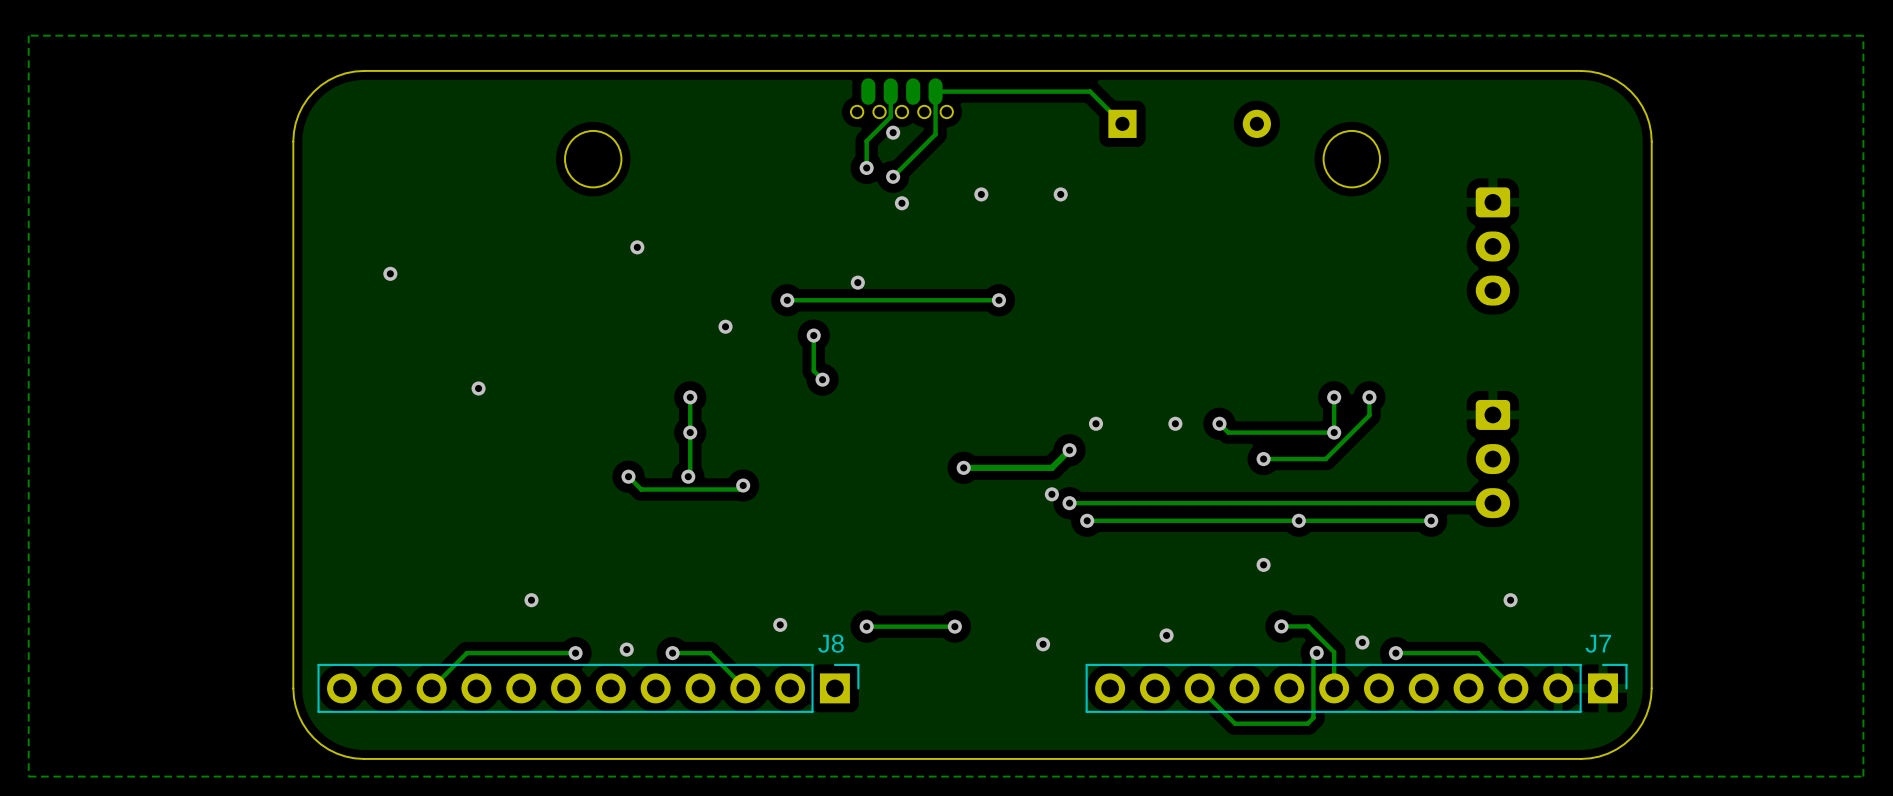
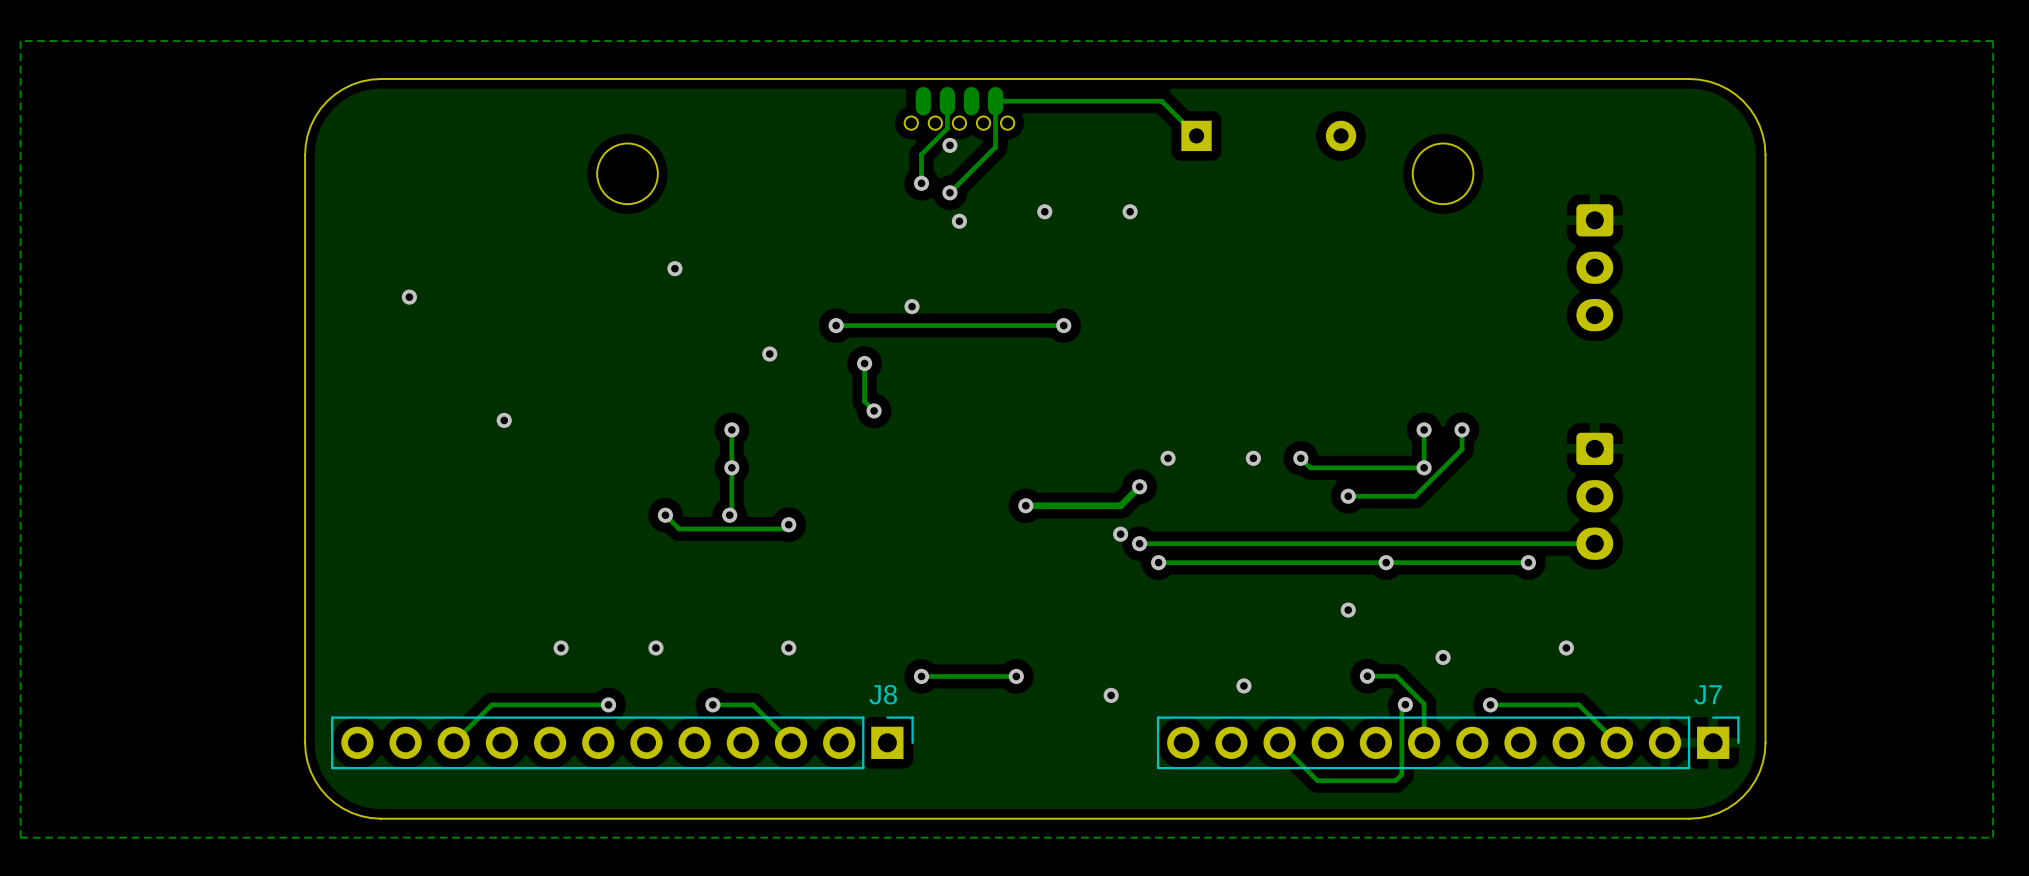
via position: (1510, 600) -> (1566, 648)
via position: (780, 624) -> (788, 648)
via position: (1362, 642) -> (1443, 657)
via position: (626, 649) -> (655, 648)

